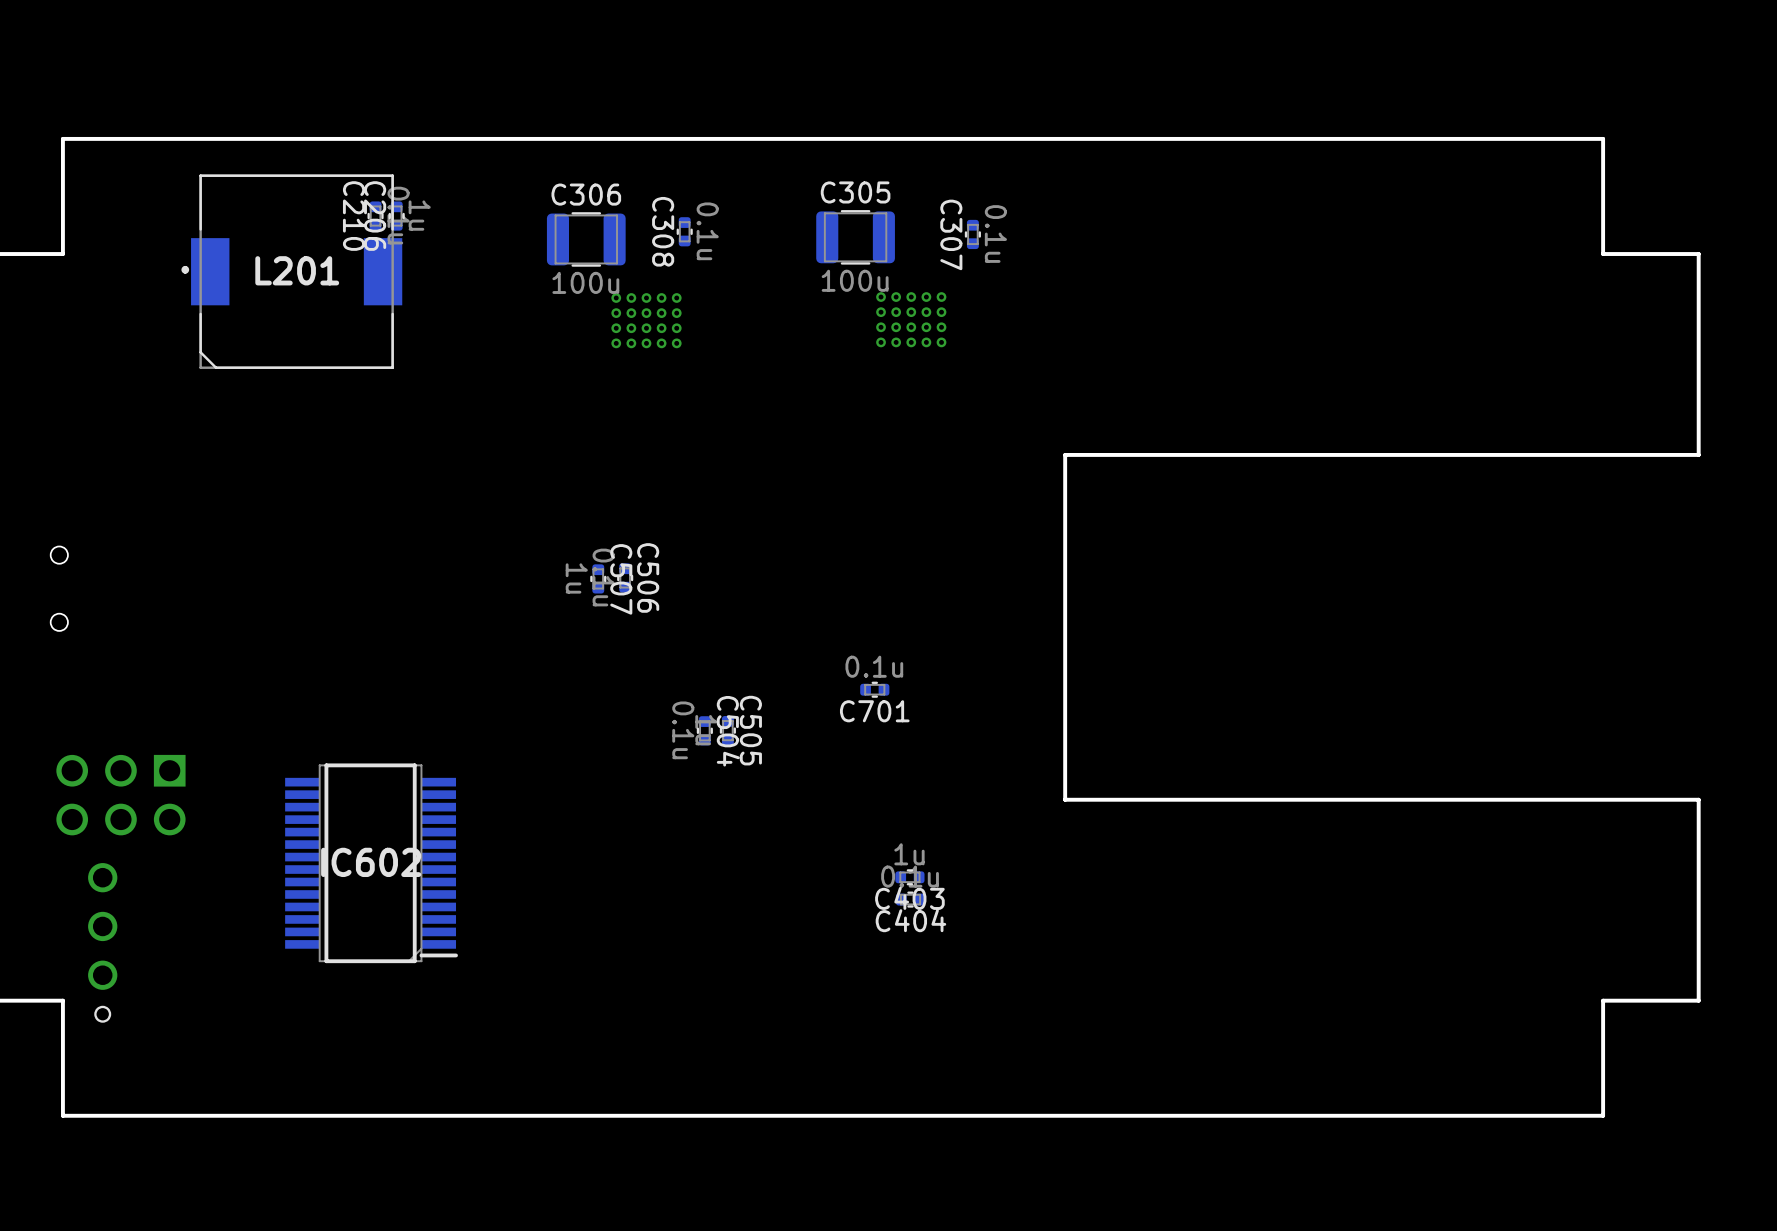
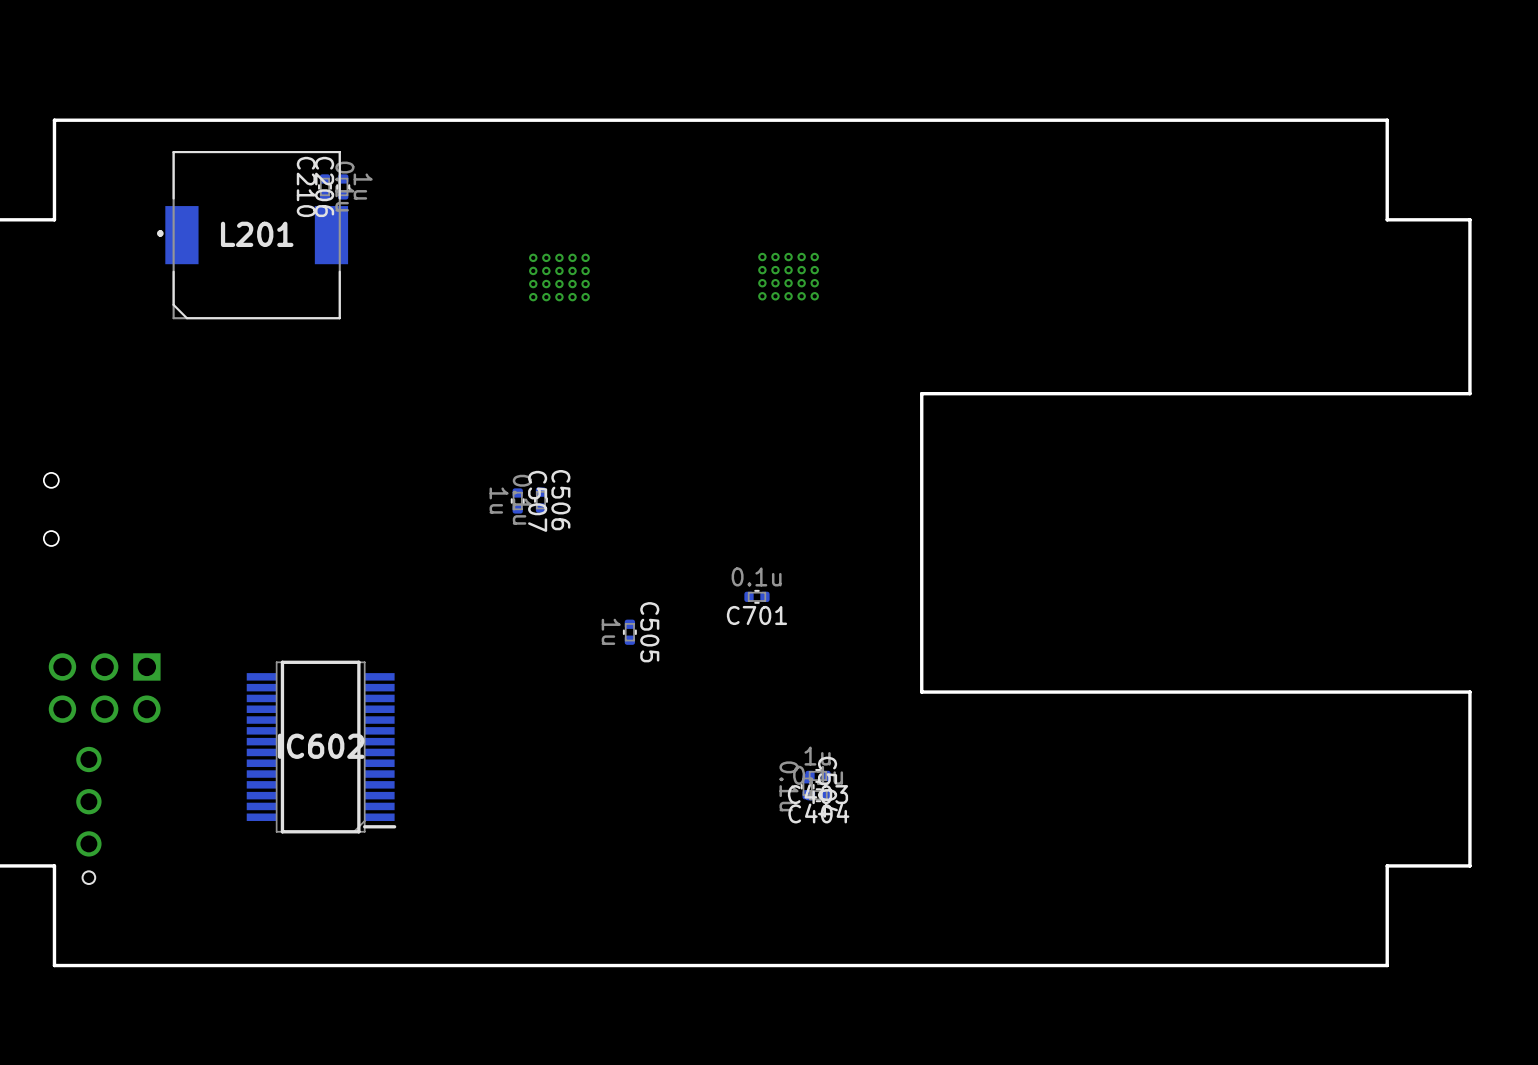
C308: 0.1u (684, 231) -> none
C307: 0.1u (972, 234) -> none
C305: 100u (855, 237) -> none
C306: 100u (586, 239) -> none
C504 position: (704, 730) -> (807, 786)
C403 position: (909, 877) -> (817, 775)
C404 position: (910, 899) -> (818, 795)

